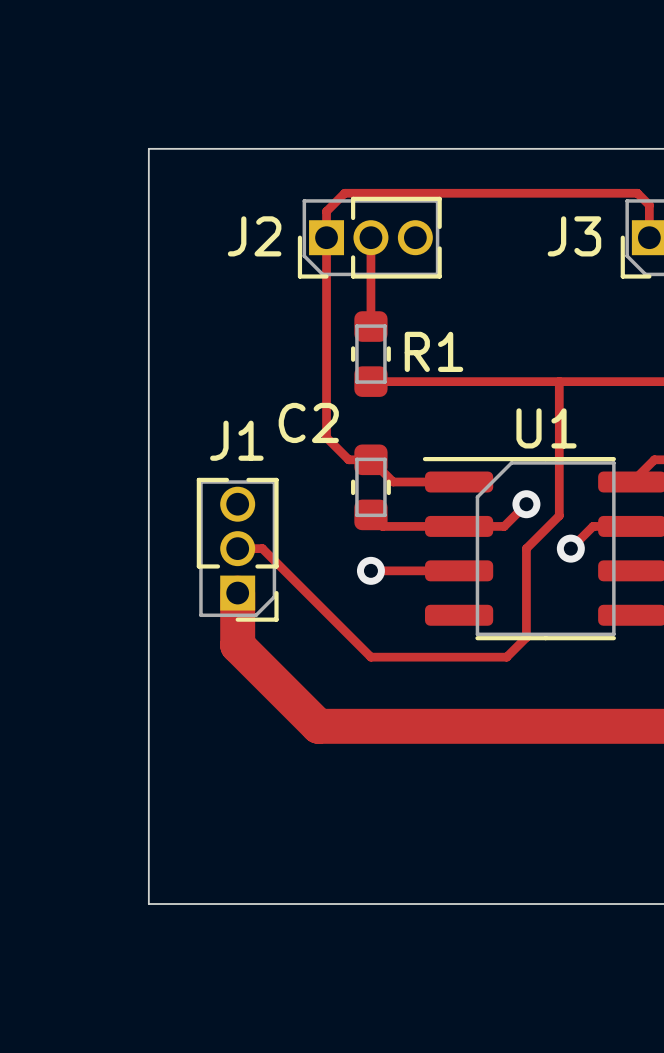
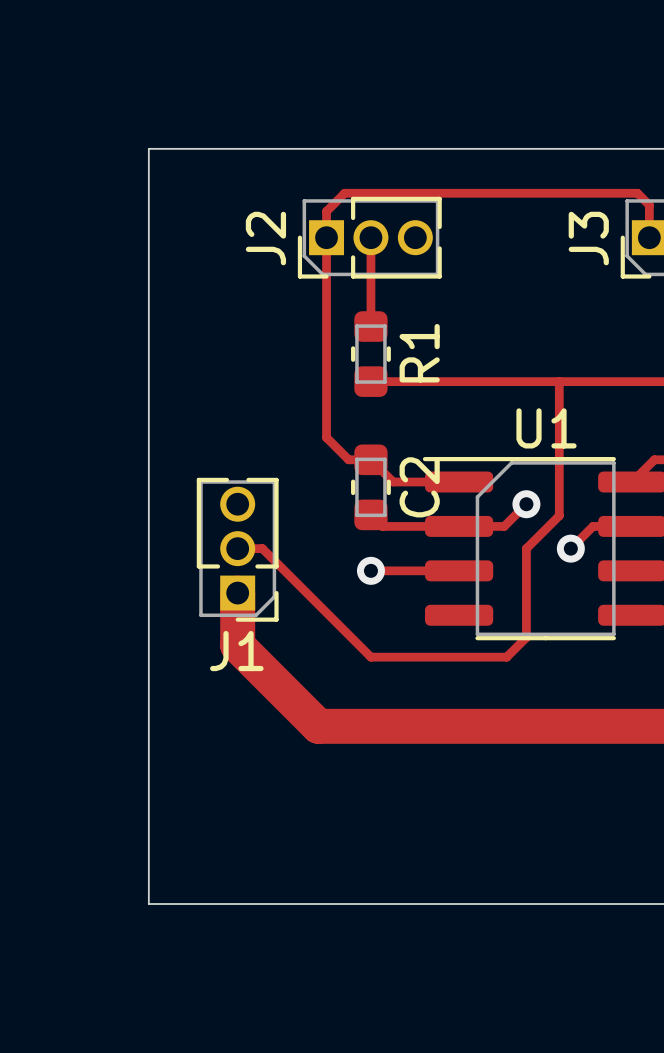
J2 name rotation: 0° (254, 236) -> 90° counterclockwise (265, 238)
J3 name rotation: 0° (574, 236) -> 90° counterclockwise (588, 238)
R1 name rotation: 0° (433, 351) -> 90° counterclockwise (419, 353)
C2 name rotation: 0° (308, 422) -> 90° counterclockwise (419, 487)
C2 name position: C2 (308, 422) -> C2 (419, 487)
J1 name position: J1 (236, 440) -> J1 (236, 651)

